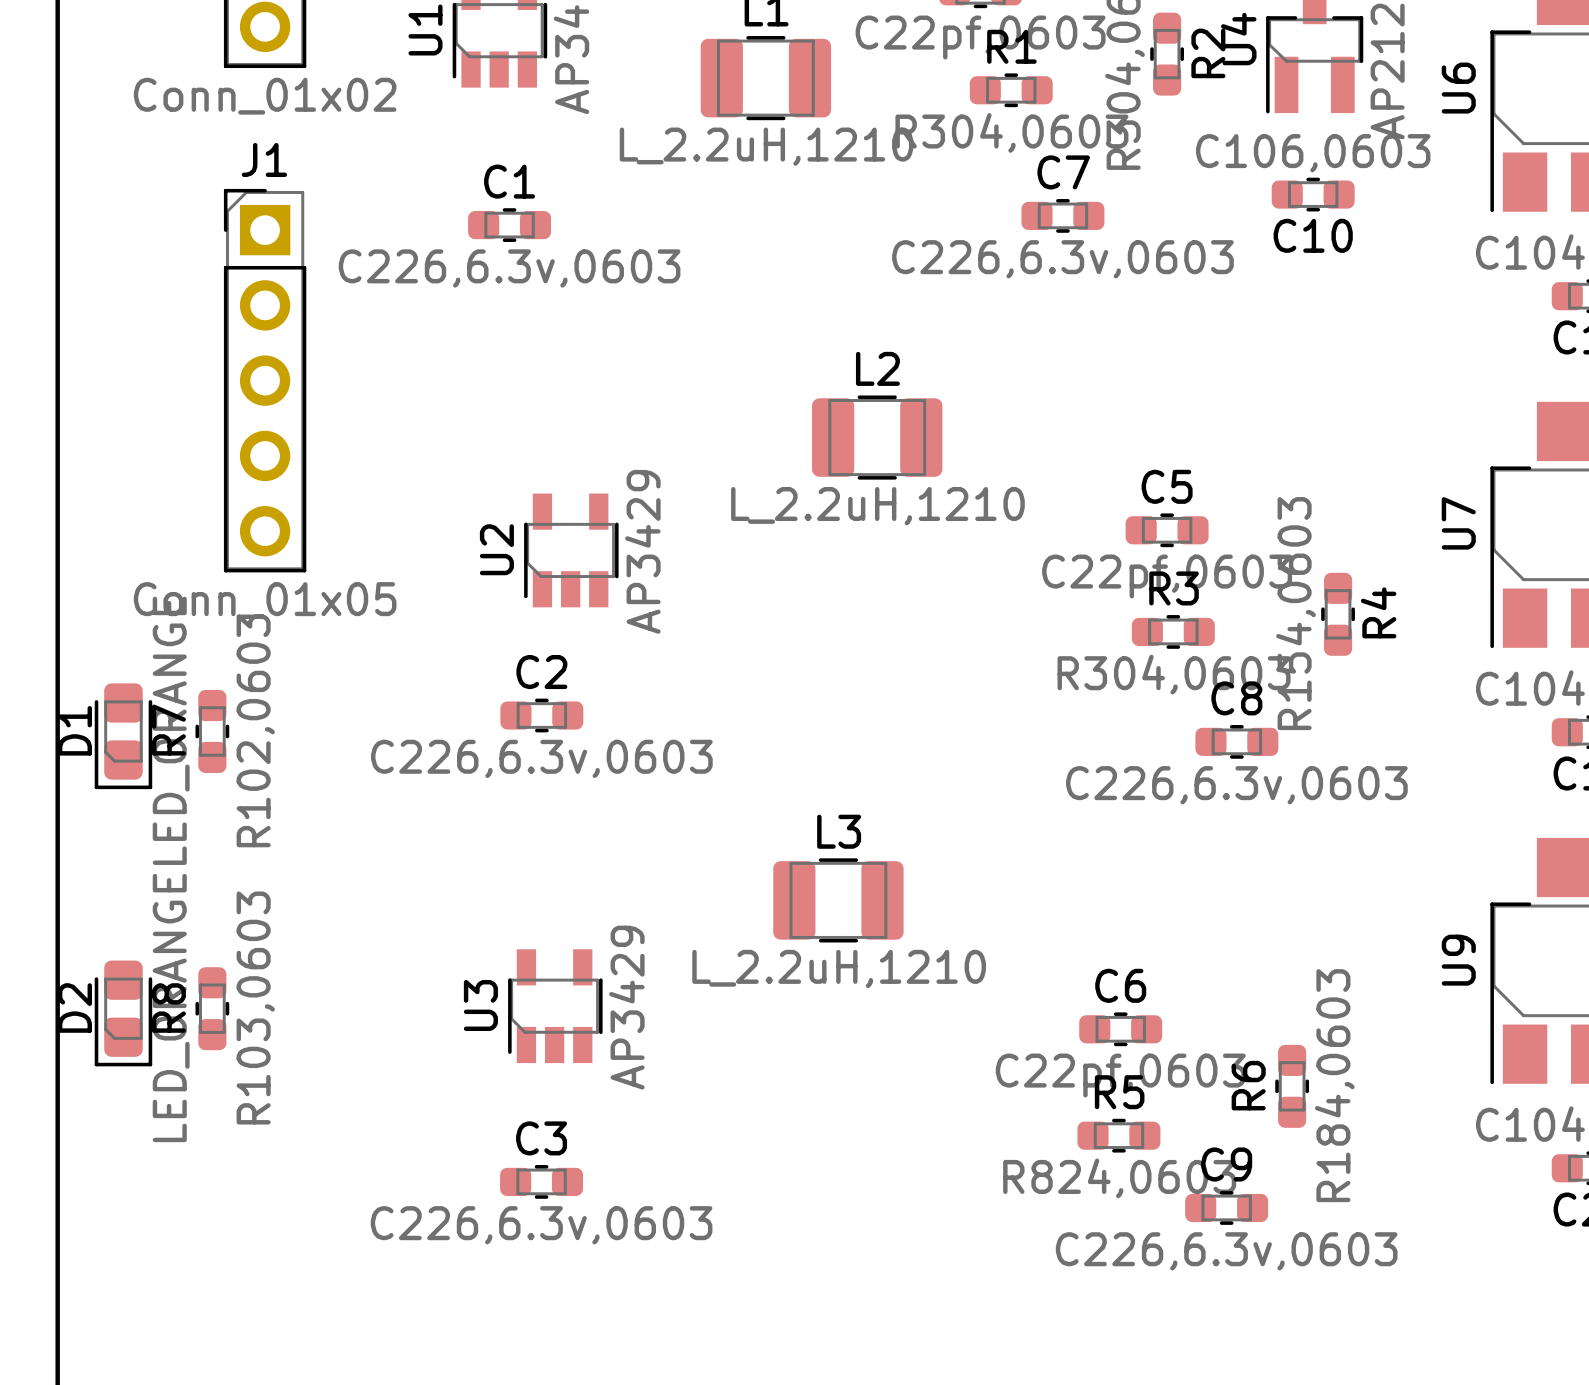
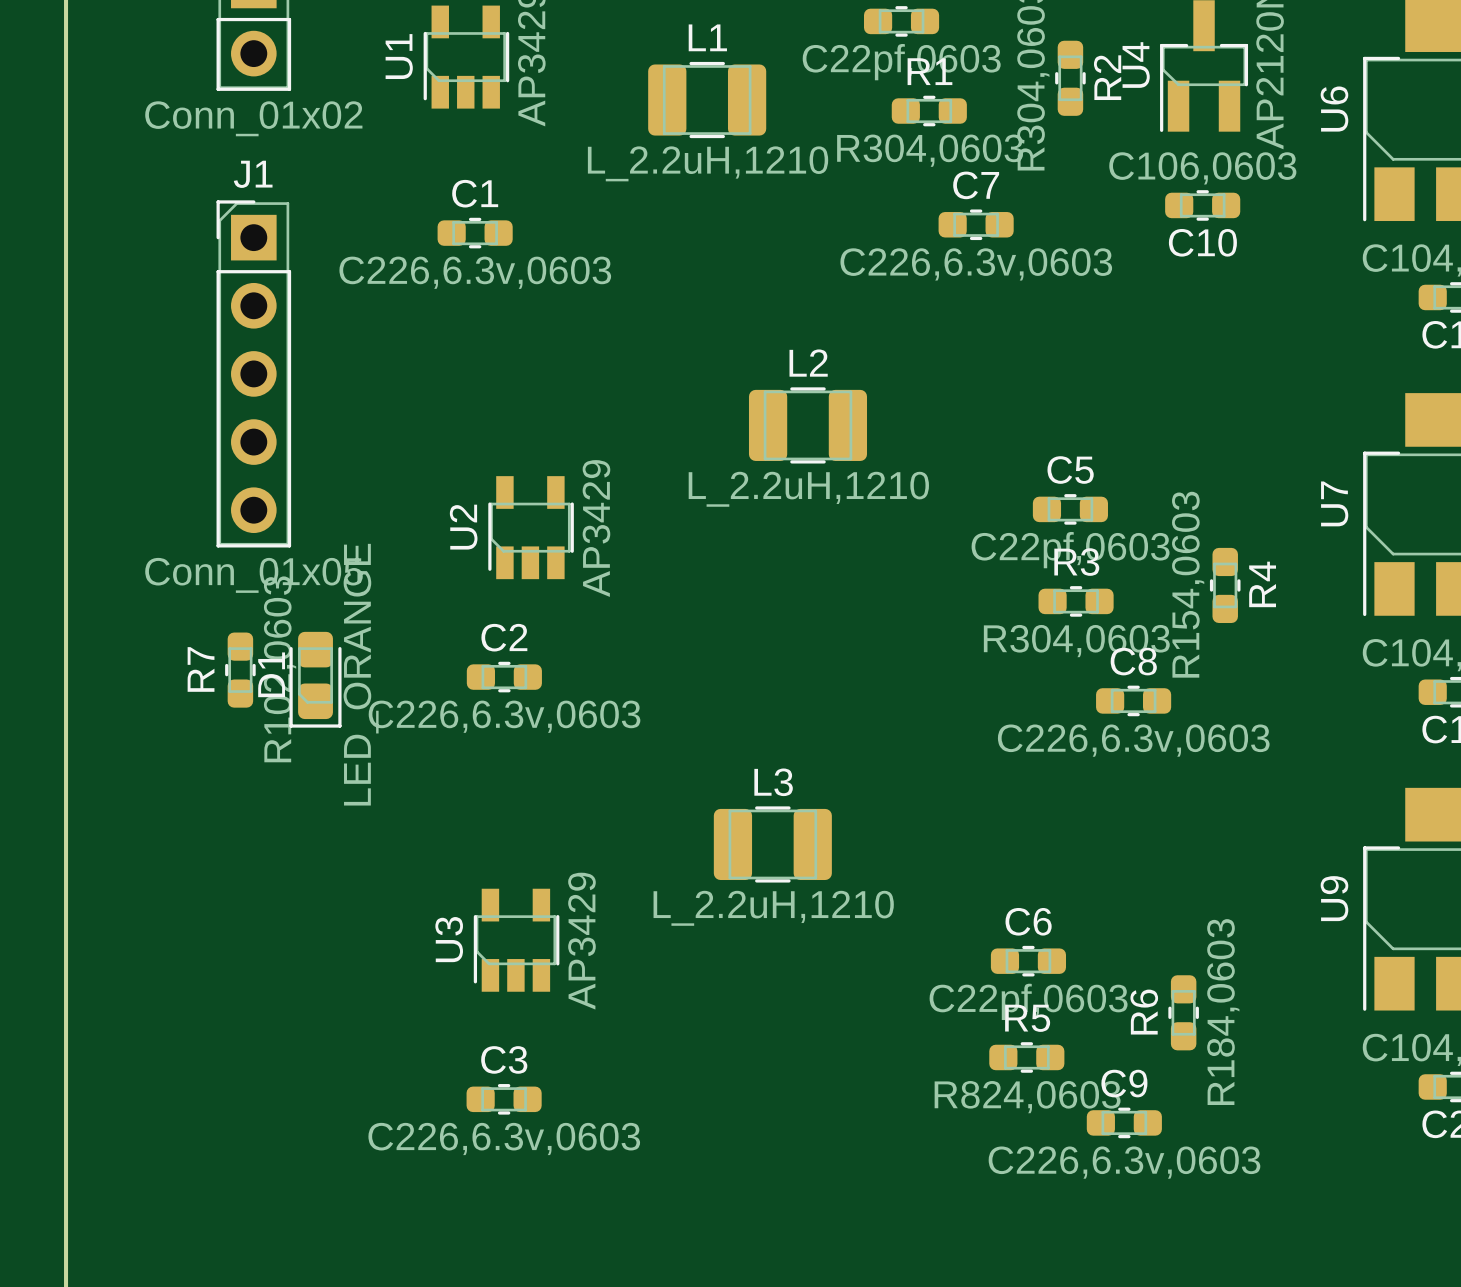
R7 position: (212, 731) -> (240, 670)
D1 position: (123, 736) -> (315, 679)
R8: R103,0603 (212, 1008) -> none
D2: LED_ORANGE (123, 1013) -> none

